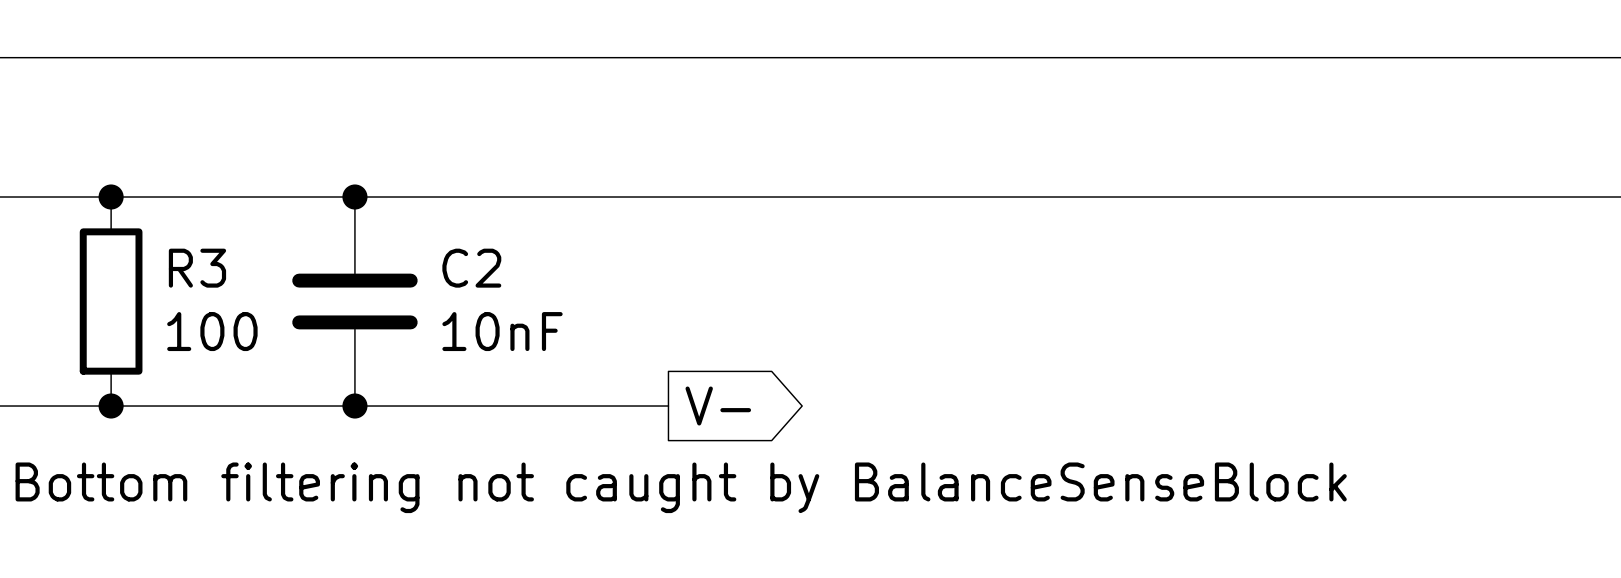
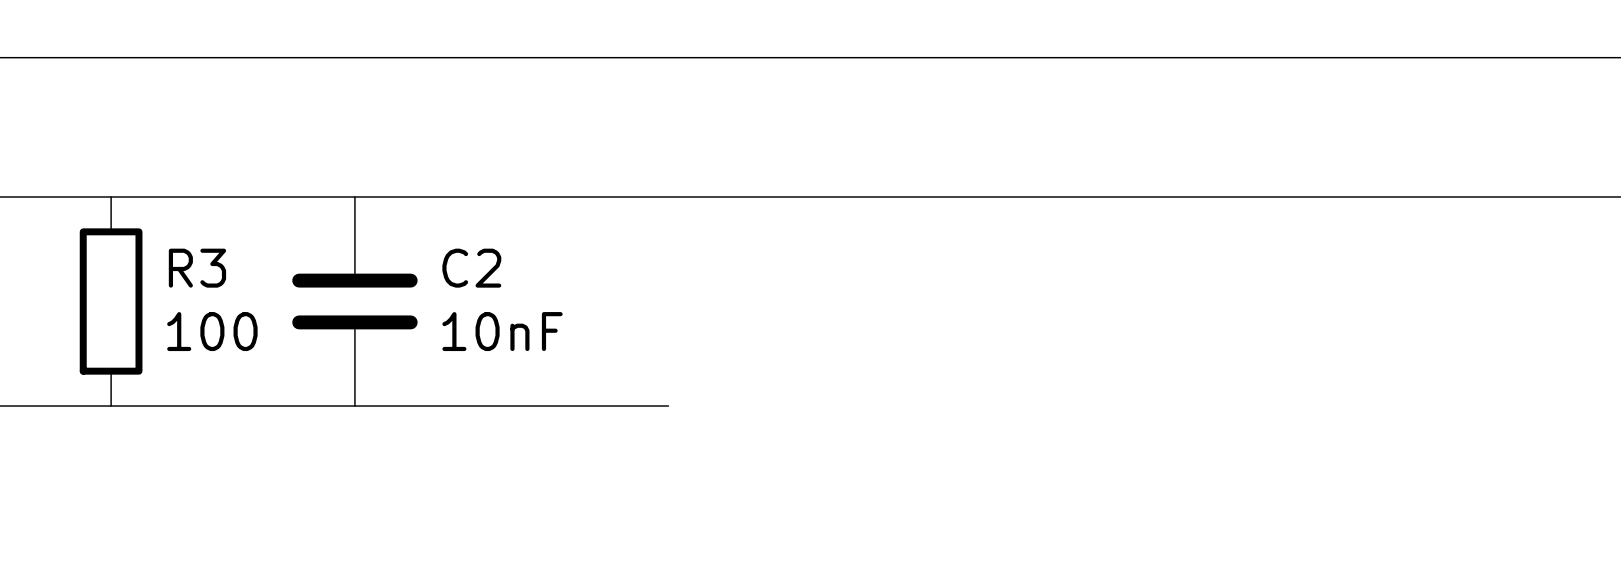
junction: (111, 197) -> none
junction: (354, 197) -> none
junction: (111, 406) -> none
junction: (354, 406) -> none
global label: V- (718, 406) -> none
text: Bottom filtering not caught by BalanceSenseBlock (681, 487) -> none

